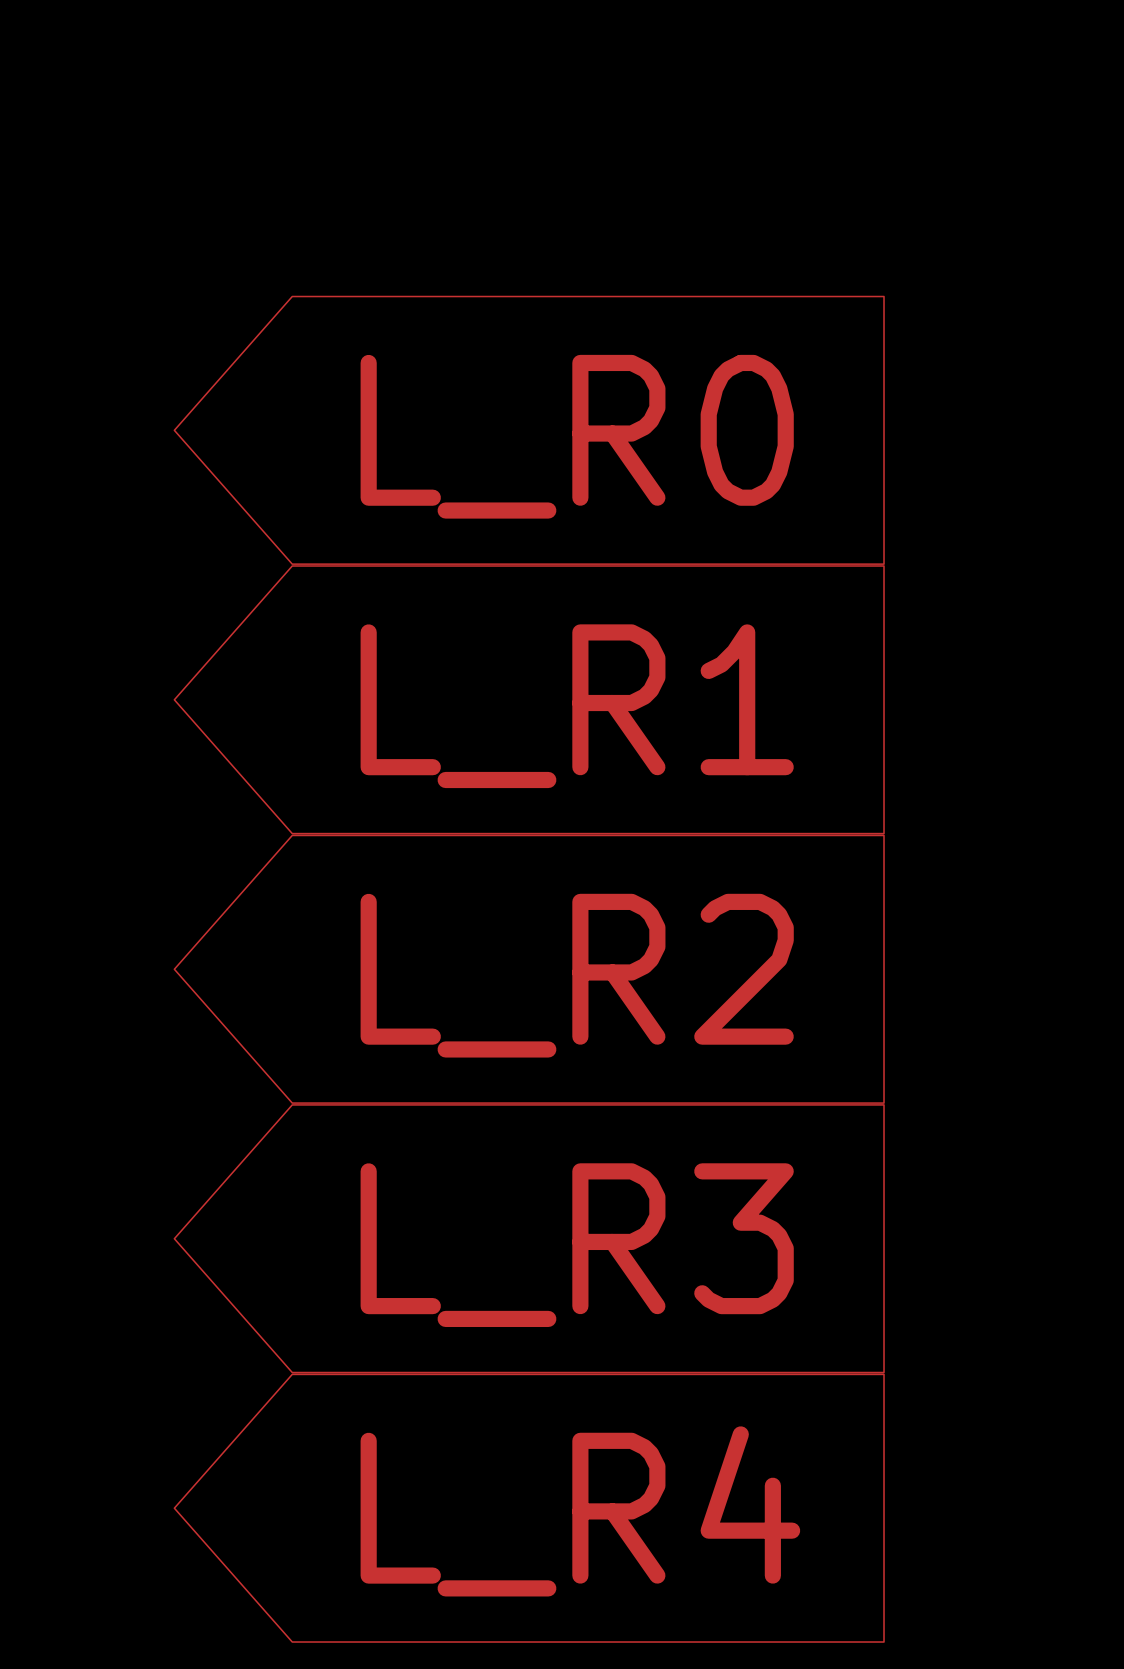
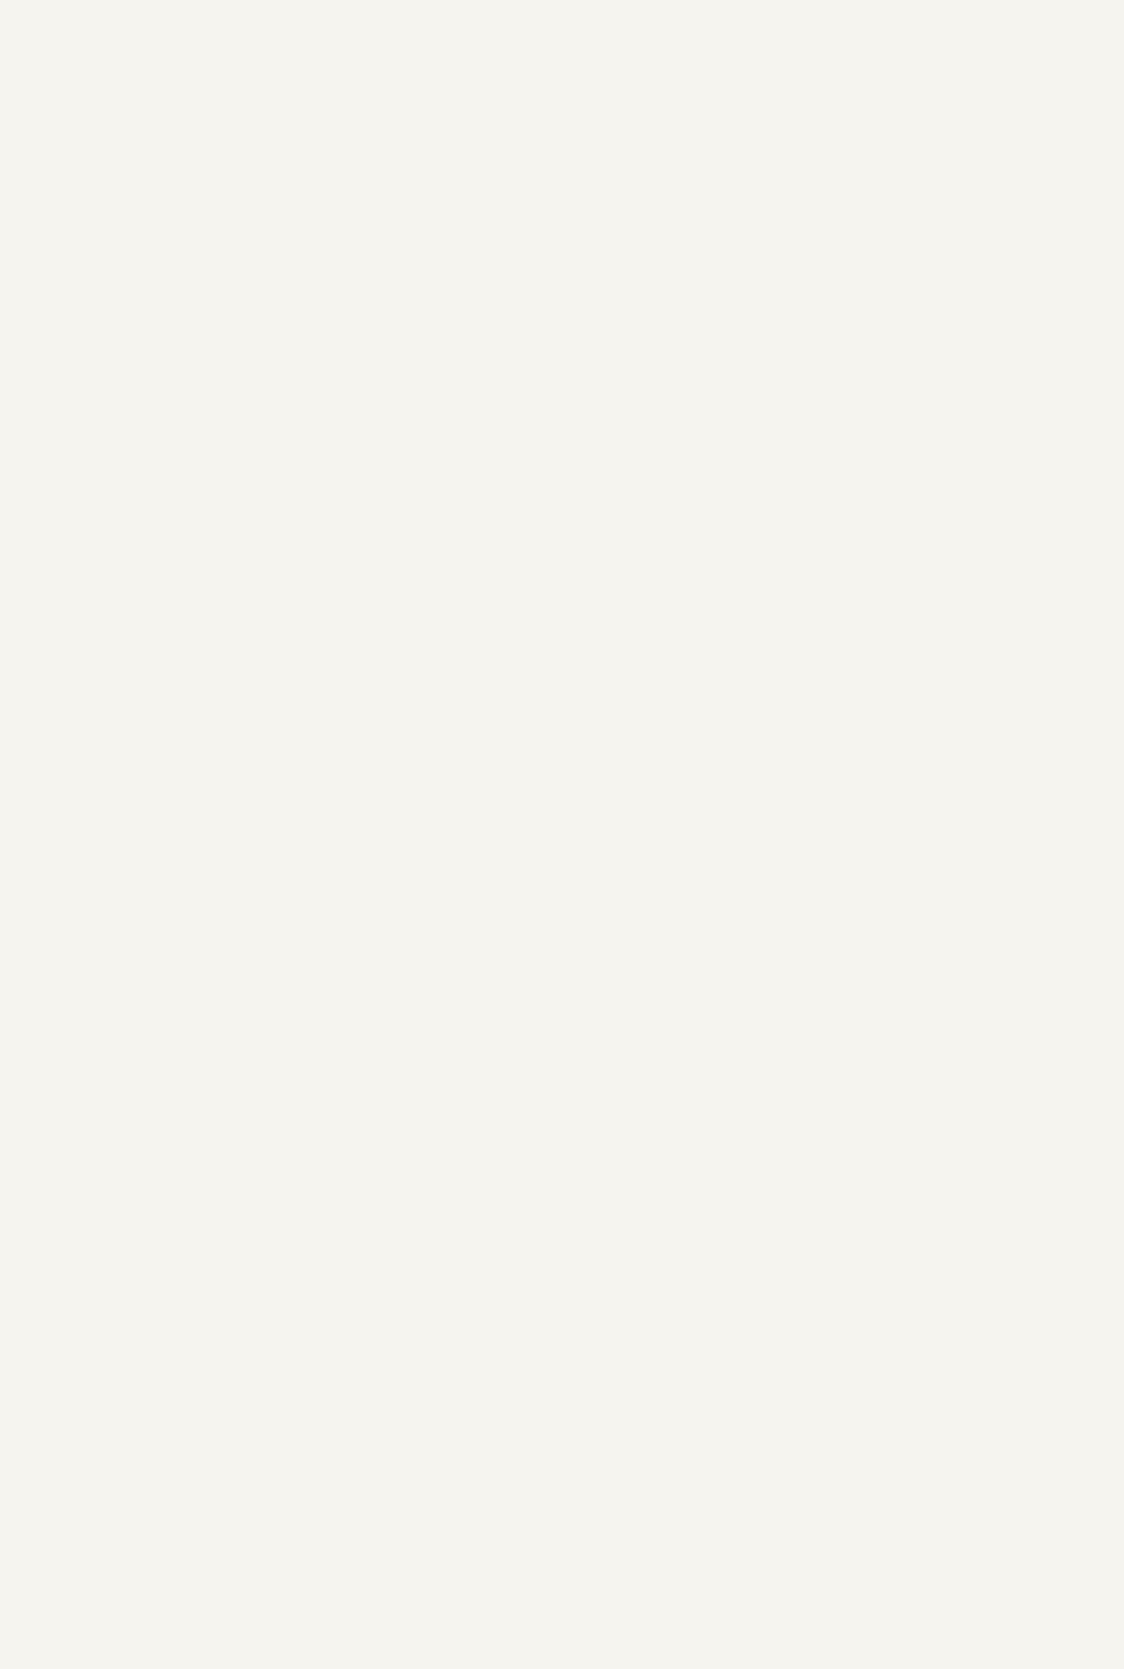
global label: L_R0 (577, 436) -> none
global label: L_R1 (577, 706) -> none
global label: L_R2 (577, 975) -> none
global label: L_R3 (577, 1245) -> none
global label: L_R4 (580, 1511) -> none

